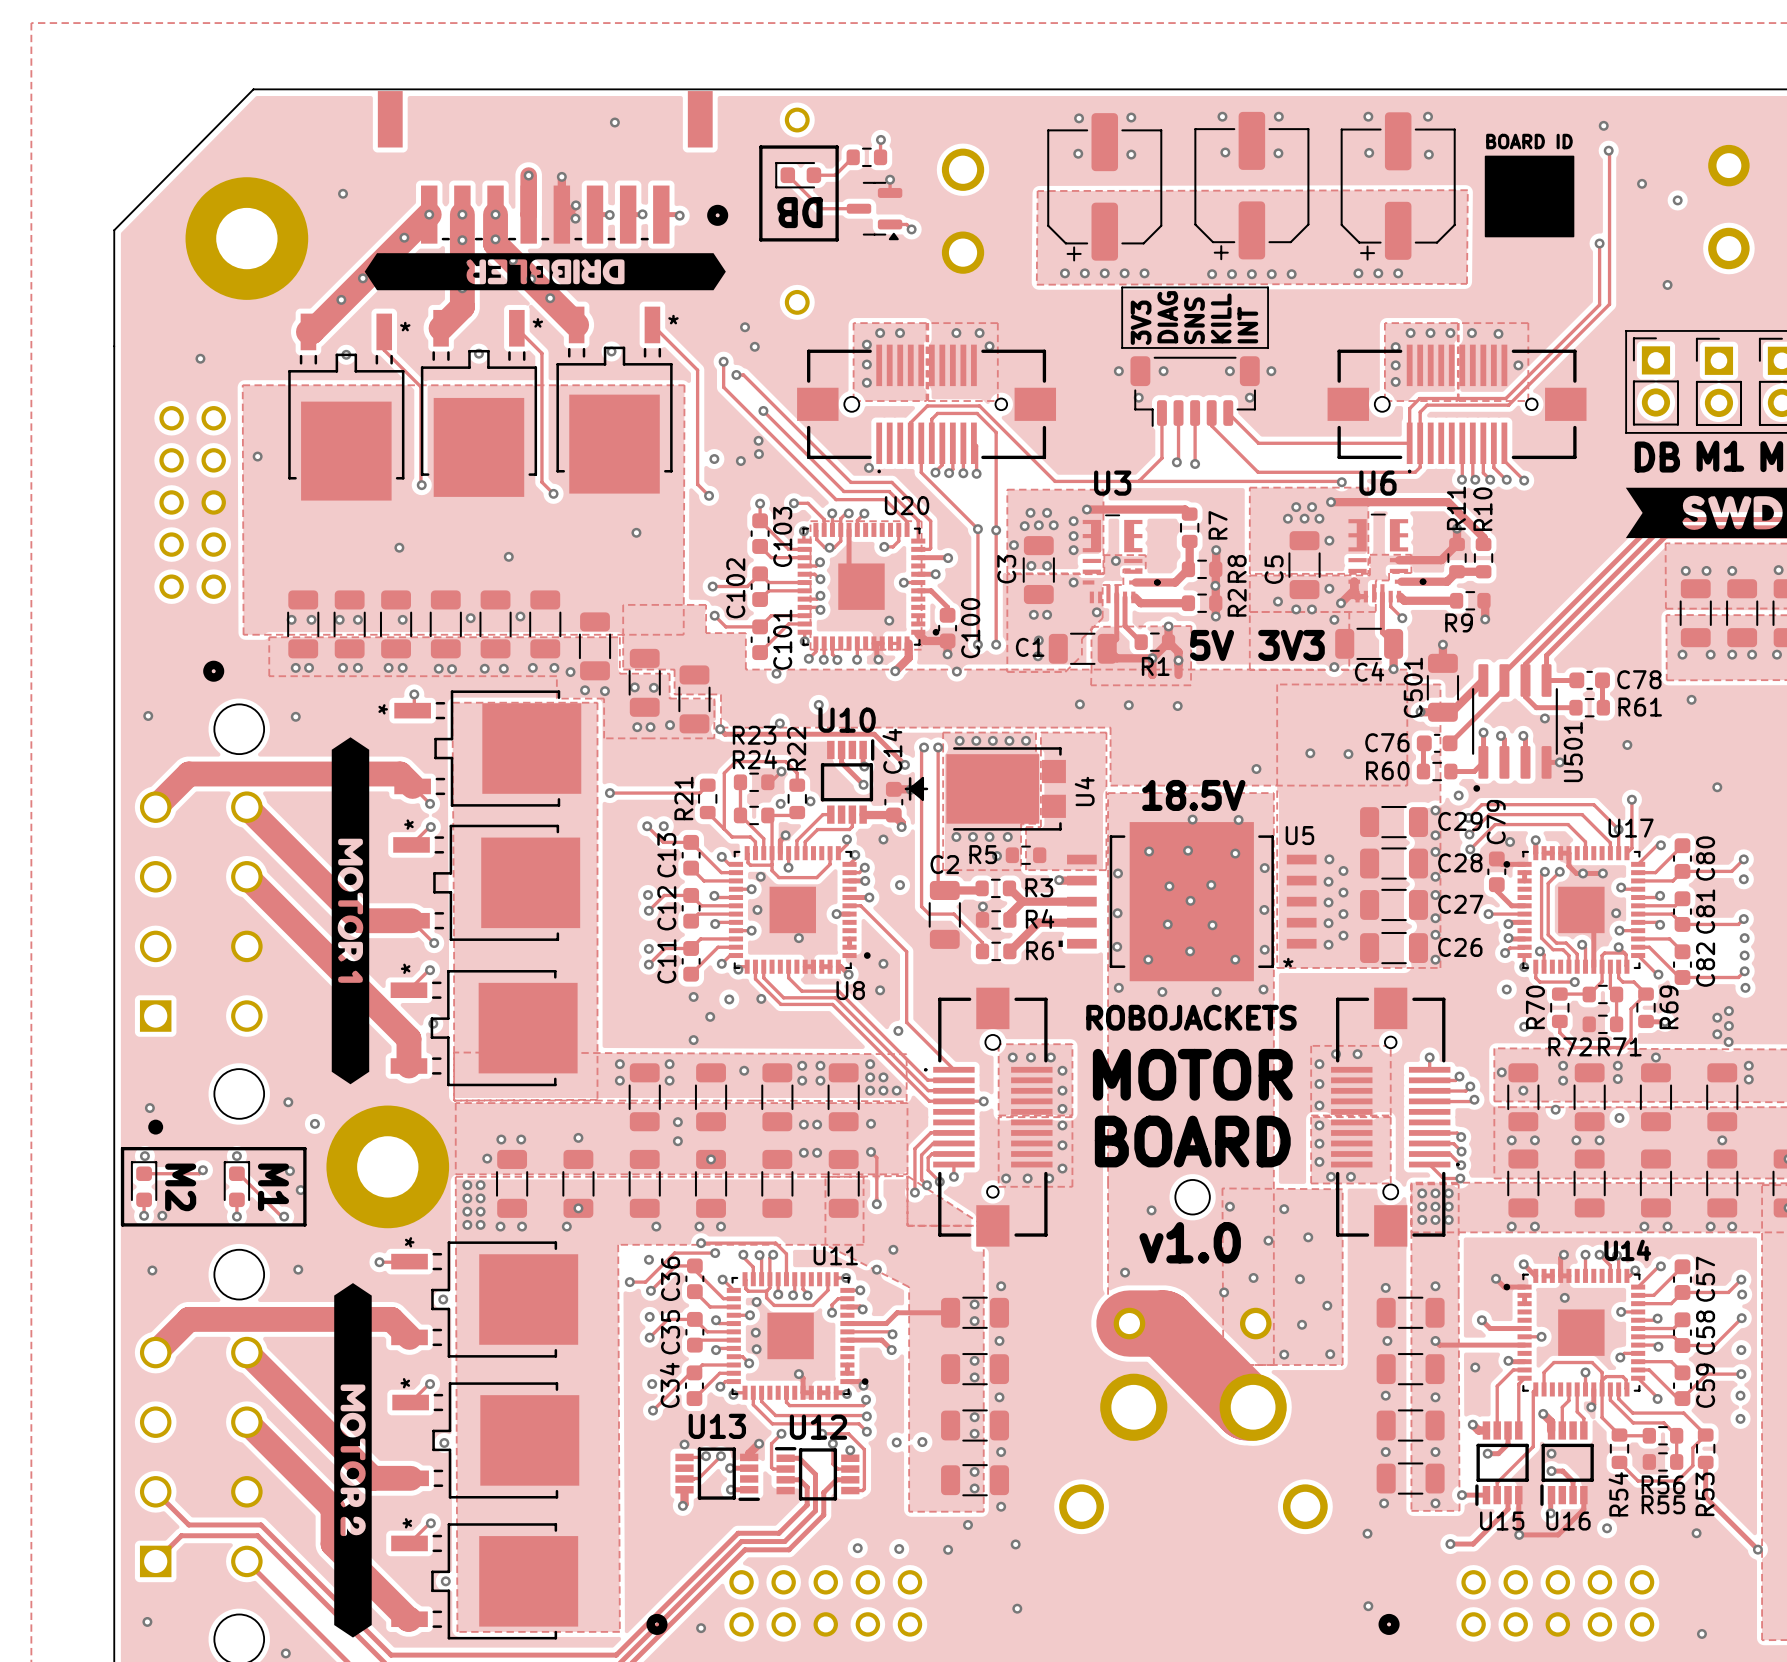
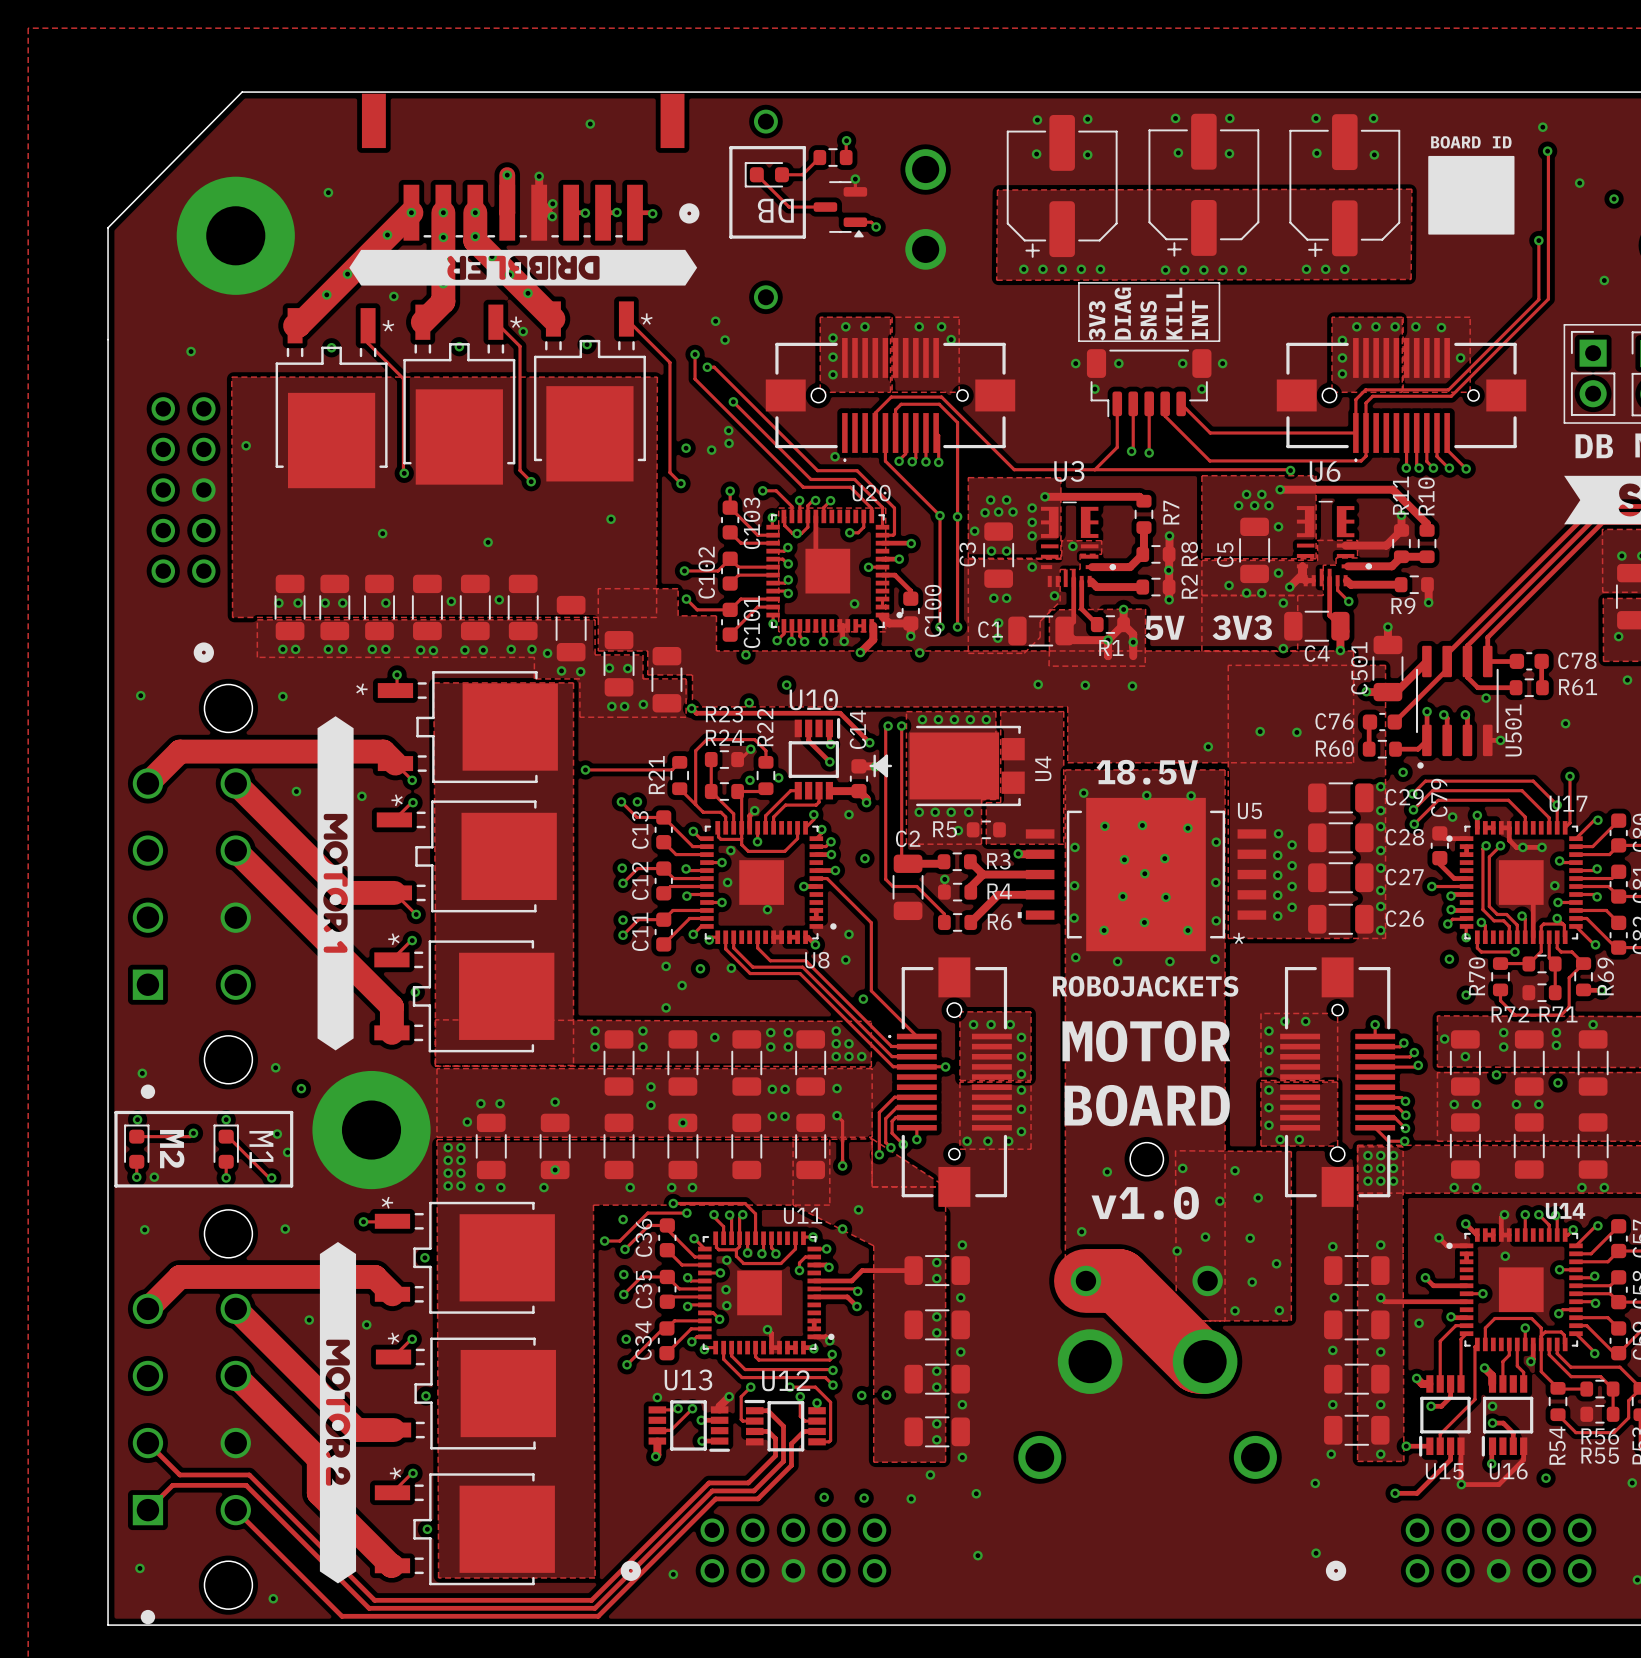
via: none -> (393, 296)
via: none -> (523, 331)
via: none -> (296, 791)
via: none -> (1083, 793)
via: none -> (361, 796)
via: none -> (309, 1320)
via: none -> (366, 1324)

